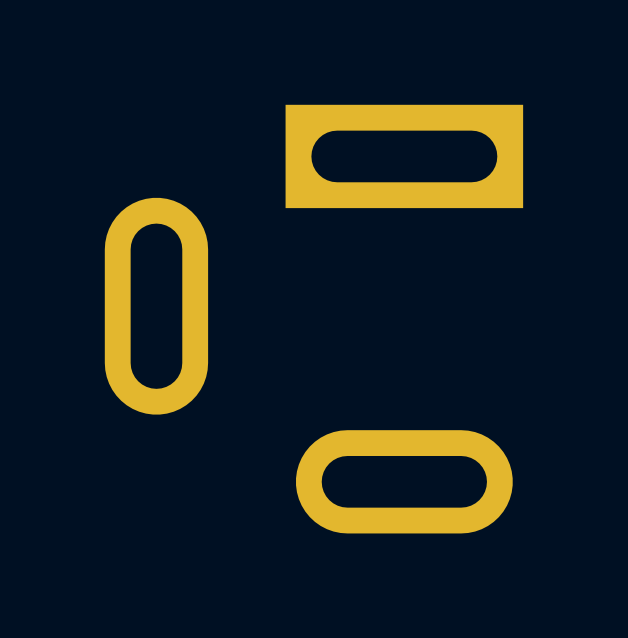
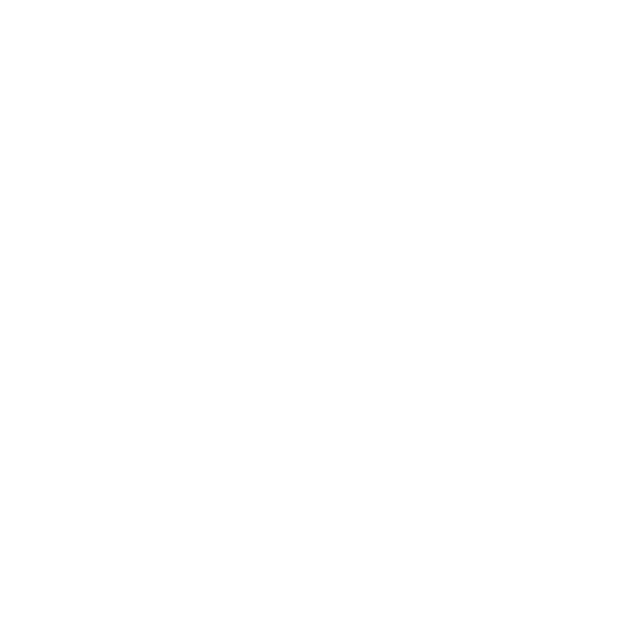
part: (313, 319) -> none

